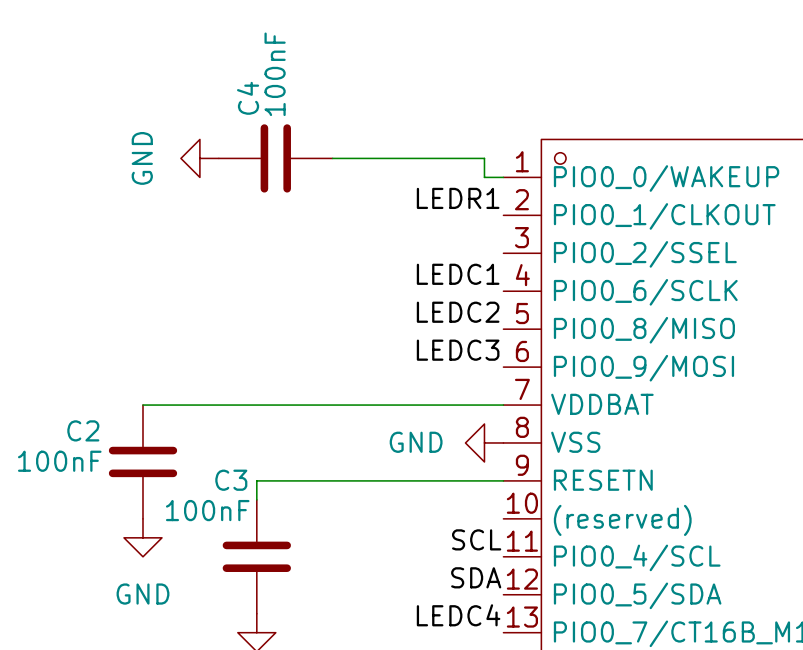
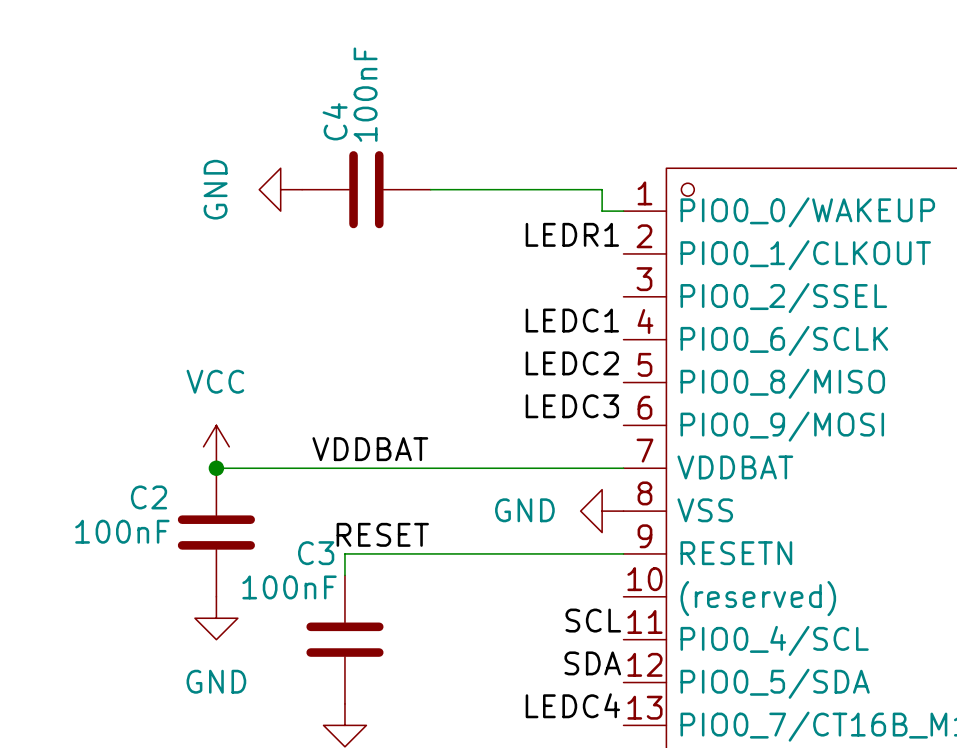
power symbol: none -> VCC (216, 446)
label: none -> VDDBAT (370, 449)
junction: none -> (216, 468)
label: none -> RESET (382, 534)

